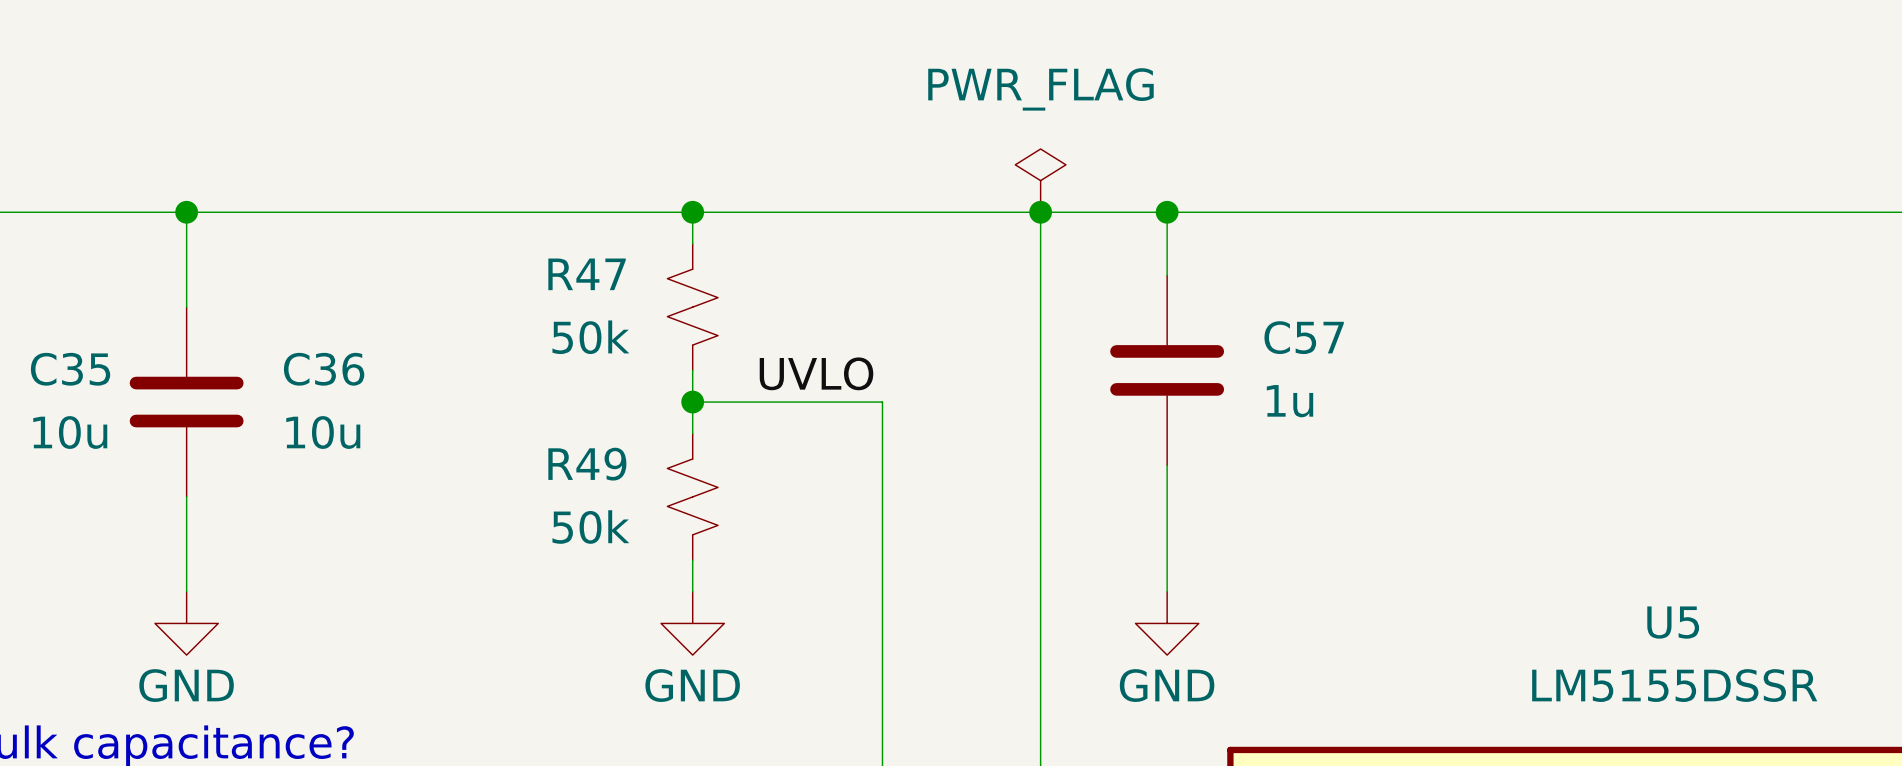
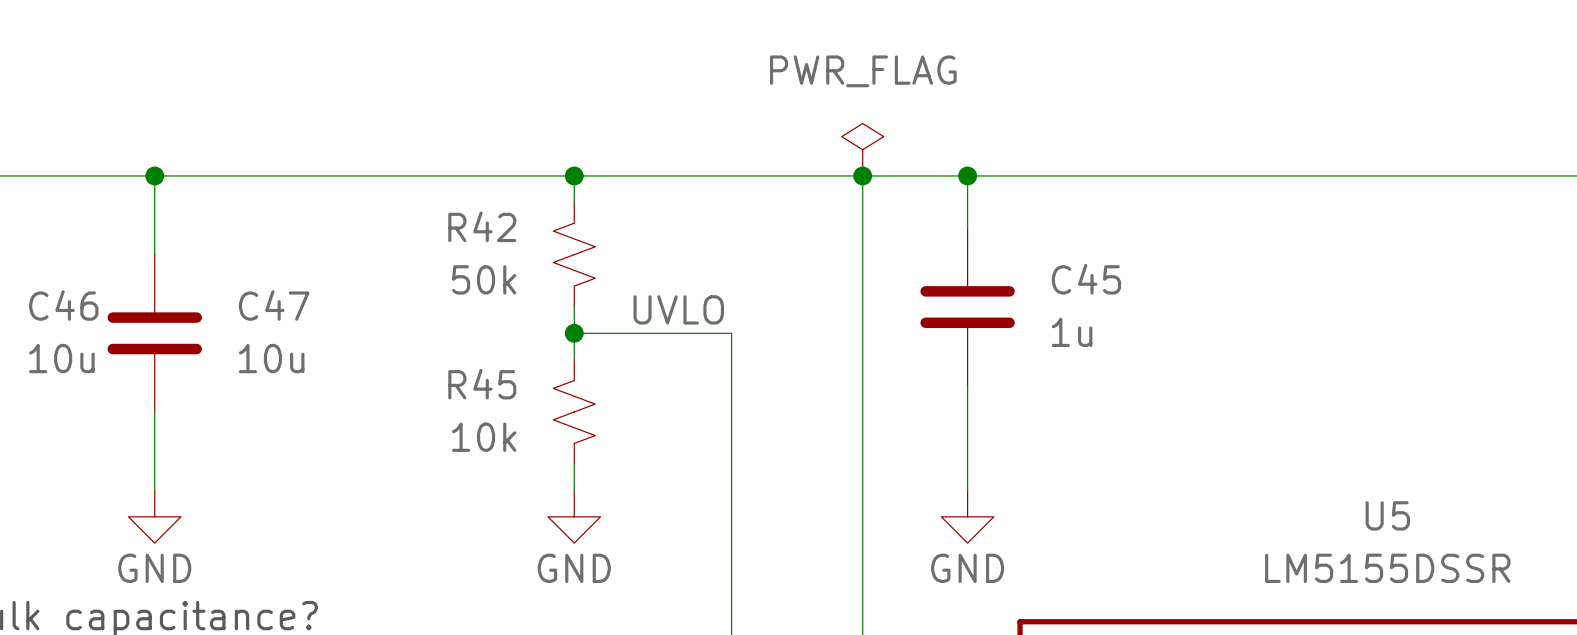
R47 name: R47 (587, 274) -> R42 (482, 226)
C57 name: C57 (1304, 337) -> C45 (1086, 279)
C35 name: C35 (70, 369) -> C46 (63, 305)
C36 name: C36 (324, 369) -> C47 (274, 305)
R49 name: R49 (587, 464) -> R45 (482, 384)
R49 value: 50k (590, 527) -> 10k (484, 437)

